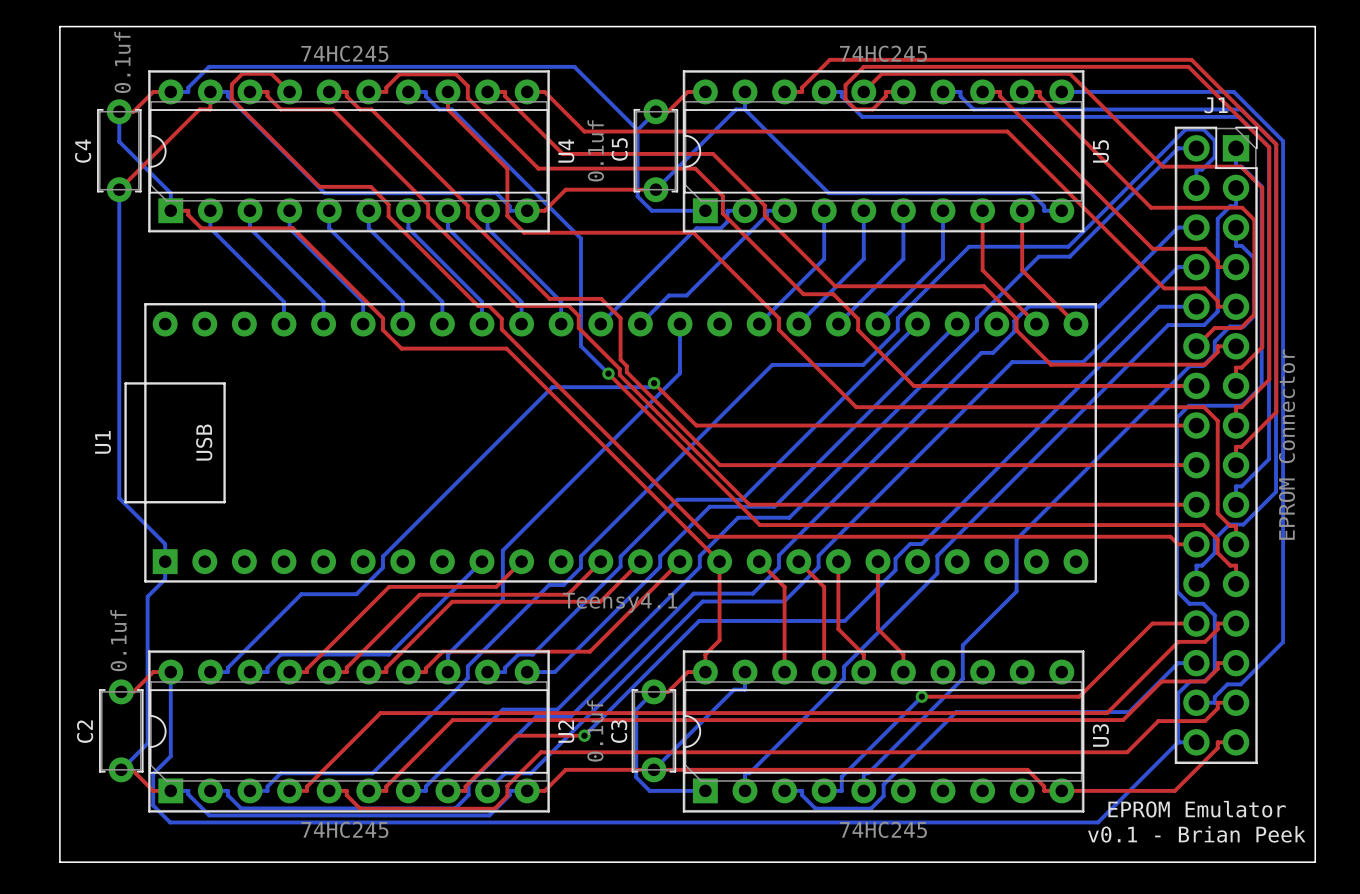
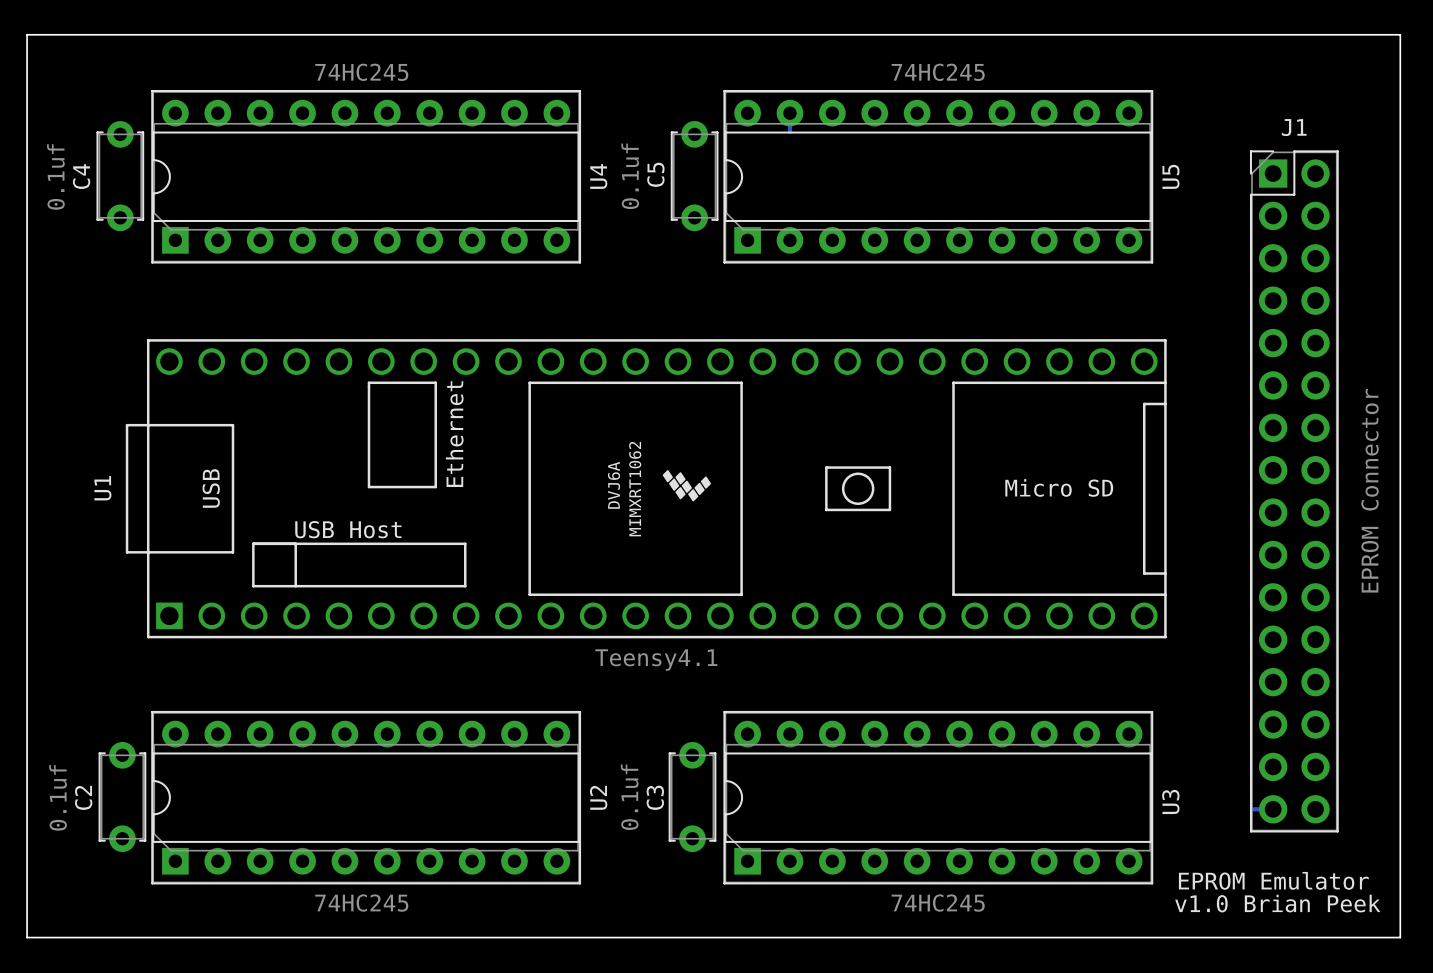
board edge: (1315, 26) (59, 26) (59, 862) -> (1400, 43) (1400, 34) (27, 34) (27, 937) (56, 937)
C4 value position: 0.1uf (122, 62) -> 0.1uf (55, 176)
bottom track: (170, 91) (188, 91) (188, 87) (209, 66) (574, 66) (637, 130) -> none
top track: (170, 91) (153, 91) (133, 111) (119, 111) -> none
bottom track: (210, 91) (227, 91) (227, 96) (324, 193) (496, 193) (509, 206) (509, 210) (527, 210) -> none
top track: (210, 91) (210, 109) (199, 109) (119, 189) -> none
top track: (249, 91) (267, 91) (267, 96) (280, 109) (332, 109) (428, 204) (428, 216) (517, 305) (568, 305) (578, 315) (578, 327) (619, 368) (619, 375) (749, 504) (1196, 504) -> none
top track: (289, 91) (271, 73) (242, 73) (231, 84) (231, 99) (319, 186) (370, 186) (388, 204) (388, 216) (478, 306) (489, 306) (501, 318) (501, 329) (709, 536) (1170, 536) (1178, 544) (1196, 544) -> none
top track: (329, 91) (346, 91) (346, 96) (359, 109) (371, 109) (467, 205) (467, 216) (549, 298) (601, 298) (620, 318) (620, 359) (626, 366) (626, 372) (719, 465) (1196, 465) -> none
top track: (368, 91) (386, 91) (386, 87) (399, 74) (456, 74) (467, 85) (467, 97) (538, 168) (695, 168) (722, 196) (722, 213) (803, 294) (833, 294) (858, 318) (858, 330) (913, 385) (1196, 385) -> none
bottom track: (408, 91) (425, 91) (425, 96) (439, 109) (451, 109) (580, 238) (580, 346) (608, 373) -> none
top track: (447, 91) (447, 109) (507, 168) (507, 215) (524, 232) (693, 232) (778, 318) (778, 329) (856, 407) (1204, 407) (1217, 420) (1217, 513) (1230, 526) (1236, 526) (1236, 544) -> none
top track: (487, 91) (505, 91) (505, 96) (562, 153) (713, 153) (764, 205) (764, 215) (835, 286) (983, 286) (1016, 318) (1016, 330) (1050, 364) (1205, 364) (1217, 352) (1217, 346) (1236, 346) -> none
top track: (527, 91) (544, 91) (584, 131) (1007, 131) (1164, 288) (1205, 288) (1217, 301) (1217, 306) (1236, 306) -> none
top track: (705, 91) (687, 91) (668, 111) (655, 111) -> none
top track: (784, 91) (802, 91) (802, 87) (829, 59) (1191, 59) (1276, 144) (1276, 412) (1241, 446) (1236, 446) (1236, 465) -> none
bottom track: (824, 91) (841, 91) (841, 96) (862, 116) (1239, 116) (1269, 146) (1269, 459) (1241, 486) (1236, 486) (1236, 504) -> none
top track: (863, 91) (881, 73) (1070, 73) (1162, 166) (1240, 166) (1262, 188) (1262, 347) (1241, 367) (1236, 367) (1236, 385) -> none
top track: (903, 91) (885, 91) (885, 96) (872, 109) (855, 109) (845, 99) (845, 85) (863, 66) (1188, 66) (1269, 147) (1269, 379) (1241, 407) (1236, 407) (1236, 425) -> none
bottom track: (943, 91) (960, 91) (960, 96) (973, 109) (1241, 109) (1276, 143) (1276, 491) (1243, 524) (1229, 524) (1214, 539) (1214, 553) (1202, 565) (1196, 565) (1196, 583) -> none
top track: (982, 91) (1000, 91) (1000, 96) (1152, 248) (1205, 248) (1217, 261) (1217, 267) (1236, 267) -> none
top track: (1022, 91) (1039, 91) (1039, 96) (1151, 207) (1242, 207) (1254, 219) (1254, 314) (1240, 328) (1214, 328) (1196, 346) -> none
bottom track: (1061, 91) (1233, 91) (1283, 141) (1283, 642) (1240, 684) (1227, 684) (1214, 697) (1214, 702) (1196, 702) -> none
bottom track: (119, 111) (119, 141) (170, 193) (170, 210) -> none
bottom track: (655, 111) (637, 130) -> none
J1 footprint: [1174, 126, 1258, 765] -> [1249, 150, 1339, 833]
bottom track: (637, 130) (637, 196) (651, 210) (705, 210) -> none
bottom track: (1196, 148) (1178, 148) (1069, 256) (1038, 256) (976, 318) (976, 330) (789, 517) (738, 517) (699, 556) (699, 567) (557, 709) (502, 709) (425, 786) (425, 790) (408, 790) -> none
bottom track: (1236, 148) (1236, 166) (1241, 166) (1261, 186) (1261, 386) (1242, 405) (1189, 405) (1177, 417) (1177, 591) (1189, 603) (1203, 603) (1214, 615) (1214, 671) (1204, 681) (1190, 681) (1178, 693) (1178, 742) (1097, 822) (170, 822) (153, 805) (153, 773) (170, 756) (170, 672) -> none
bottom track: (1196, 187) (1196, 169) (1202, 169) (1214, 157) (1214, 140) (1203, 129) (1185, 129) (1068, 246) (969, 246) (897, 318) (897, 330) (863, 364) (772, 364) (580, 556) (580, 567) (563, 585) (549, 585) (467, 666) (467, 678) (372, 773) (280, 773) (267, 786) (267, 790) (249, 790) -> none
bottom track: (1236, 187) (1236, 206) (1230, 206) (1217, 218) (1217, 311) (1204, 325) (1168, 325) (937, 555) (937, 573) (844, 666) (844, 678) (749, 773) (745, 773) (745, 790) -> none
bottom track: (119, 189) (119, 498) (165, 544) (165, 579) (147, 596) (147, 743) (121, 769) -> none
bottom track: (655, 189) (736, 109) (745, 109) (828, 193) (1031, 193) (1044, 206) (1044, 210) (1061, 210) -> none
top track: (655, 189) (565, 189) (544, 210) (527, 210) -> none
top track: (170, 210) (188, 210) (188, 215) (201, 228) (292, 228) (382, 318) (382, 330) (401, 348) (506, 348) (719, 561) (719, 640) (705, 654) (705, 672) (687, 672) (668, 691) (653, 691) -> none
bottom track: (210, 210) (210, 228) (283, 301) (283, 324) -> none
bottom track: (249, 210) (249, 228) (323, 301) (323, 324) -> none
bottom track: (289, 210) (289, 228) (363, 301) (363, 324) -> none
bottom track: (329, 210) (329, 228) (402, 301) (402, 324) -> none
bottom track: (368, 210) (368, 228) (442, 301) (442, 324) -> none
bottom track: (408, 210) (408, 228) (481, 301) (481, 324) -> none
bottom track: (447, 210) (447, 228) (521, 301) (521, 324) -> none
bottom track: (487, 210) (487, 228) (561, 301) (561, 324) -> none
bottom track: (745, 210) (727, 210) (727, 221) (720, 228) (696, 228) (600, 324) -> none
bottom track: (784, 210) (767, 210) (767, 215) (686, 295) (668, 295) (640, 324) -> none
bottom track: (824, 210) (824, 259) (759, 324) -> none
bottom track: (863, 210) (863, 259) (798, 324) -> none
bottom track: (903, 210) (903, 259) (838, 324) -> none
bottom track: (943, 210) (943, 259) (877, 324) -> none
top track: (982, 210) (982, 270) (1036, 324) -> none
top track: (1022, 210) (1022, 270) (1075, 324) -> none
bottom track: (1196, 227) (1178, 227) (1099, 306) (1028, 306) (1014, 320) (1014, 331) (993, 352) (981, 352) (778, 555) (778, 567) (752, 593) (693, 593) (570, 716) (536, 716) (468, 784) (468, 795) (455, 808) (241, 808) (227, 795) (227, 790) (210, 790) -> none
bottom track: (1236, 227) (1236, 245) (1241, 245) (1254, 258) (1254, 315) (1243, 326) (1229, 326) (1214, 341) (1214, 354) (1202, 366) (1189, 366) (1016, 539) (1016, 591) (962, 645) (962, 678) (868, 773) (863, 773) (863, 790) -> none
bottom track: (1196, 267) (1178, 267) (1083, 362) (1012, 362) (818, 555) (818, 567) (784, 601) (702, 601) (530, 773) (505, 773) (487, 790) -> none
U1 footprint: [124, 303, 1097, 583] -> [125, 339, 1167, 639]
bottom track: (1196, 306) (1159, 306) (921, 544) (910, 544) (895, 558) (895, 570) (844, 620) (699, 620) (584, 735) -> none
bottom track: (679, 324) (679, 373) (502, 550) (502, 599) (447, 654) (447, 672) -> none
bottom track: (917, 324) (741, 499) (677, 499) (620, 556) (620, 566) (532, 654) (518, 654) (505, 667) (505, 672) (487, 672) -> none
bottom track: (957, 324) (774, 506) (709, 506) (660, 556) (660, 566) (554, 672) (527, 672) -> none
top track: (608, 373) (759, 525) (1203, 525) (1217, 539) (1217, 553) (1230, 565) (1236, 565) (1236, 583) -> none
via: (608, 373) -> none
bottom track: (654, 383) (650, 387) (552, 387) (382, 556) (382, 567) (356, 594) (301, 594) (227, 667) (227, 672) (210, 672) -> none
top track: (654, 383) (696, 425) (1196, 425) -> none
via: (654, 383) -> none
bottom track: (481, 561) (389, 654) (280, 654) (267, 667) (267, 672) (249, 672) -> none
top track: (521, 561) (496, 586) (389, 586) (307, 668) (307, 672) (289, 672) -> none
top track: (600, 561) (567, 594) (419, 594) (346, 667) (346, 672) (329, 672) -> none
top track: (640, 561) (600, 601) (452, 601) (386, 667) (386, 672) (368, 672) -> none
top track: (679, 561) (589, 651) (442, 651) (425, 668) (425, 672) (408, 672) -> none
top track: (759, 561) (784, 587) (784, 672) -> none
top track: (798, 561) (824, 587) (824, 672) -> none
top track: (838, 561) (838, 629) (863, 654) (863, 672) -> none
top track: (877, 561) (877, 629) (903, 654) (903, 672) -> none
top track: (1196, 623) (1152, 623) (1079, 696) (921, 696) -> none
top track: (1236, 623) (1217, 623) (1217, 629) (1205, 641) (1178, 641) (1107, 713) (380, 713) (307, 786) (307, 790) (289, 790) -> none
C2 value position: 0.1uf (118, 640) -> 0.1uf (58, 797)
bottom track: (1196, 663) (1178, 663) (1129, 712) (956, 712) (883, 784) (883, 796) (871, 808) (815, 808) (802, 795) (802, 790) (784, 790) -> none
top track: (1236, 663) (1217, 663) (1217, 668) (1205, 681) (1161, 681) (1123, 720) (452, 720) (386, 786) (386, 790) (368, 790) -> none
top track: (170, 672) (153, 672) (133, 691) (121, 691) -> none
bottom track: (745, 672) (745, 689) (734, 689) (653, 769) -> none
bottom track: (653, 691) (636, 709) (636, 777) (649, 790) (705, 790) -> none
bottom track: (921, 696) (841, 776) (841, 790) (824, 790) -> none
via: (921, 696) -> none
top track: (1236, 702) (1217, 702) (1217, 708) (1205, 721) (1158, 721) (1127, 752) (540, 752) (507, 785) (507, 796) (494, 808) (360, 808) (346, 795) (346, 790) (329, 790) -> none
top track: (584, 735) (516, 735) (465, 786) (465, 790) (447, 790) -> none
via: (584, 735) -> none
top track: (1236, 742) (1217, 742) (1217, 748) (1174, 790) (1044, 790) (1044, 786) (1027, 769) (565, 769) (544, 790) (527, 790) -> none
top track: (121, 769) (132, 769) (153, 790) (170, 790) -> none
bottom track: (170, 790) (188, 790) (188, 794) (209, 815) (489, 815) (509, 795) (509, 790) (527, 790) -> none
text: v0.1 - Brian Peek (1196, 834) -> v1.0 Brian Peek (1277, 903)

